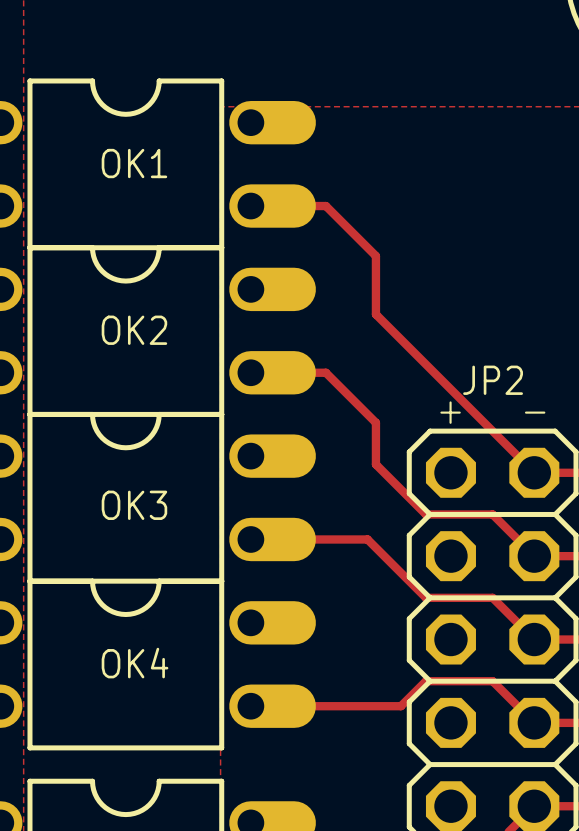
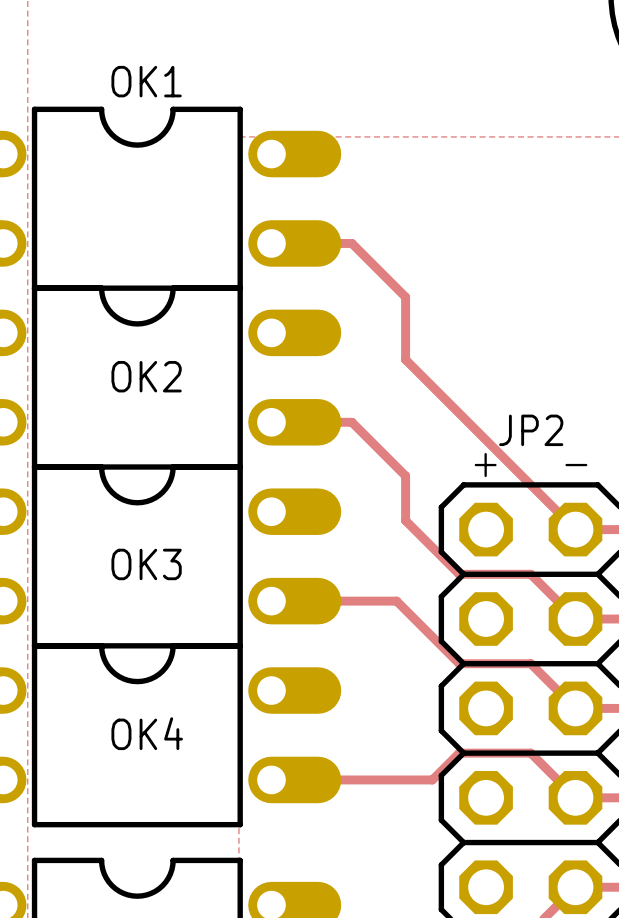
OK1 name position: OK1 (134, 163) -> OK1 (146, 81)

